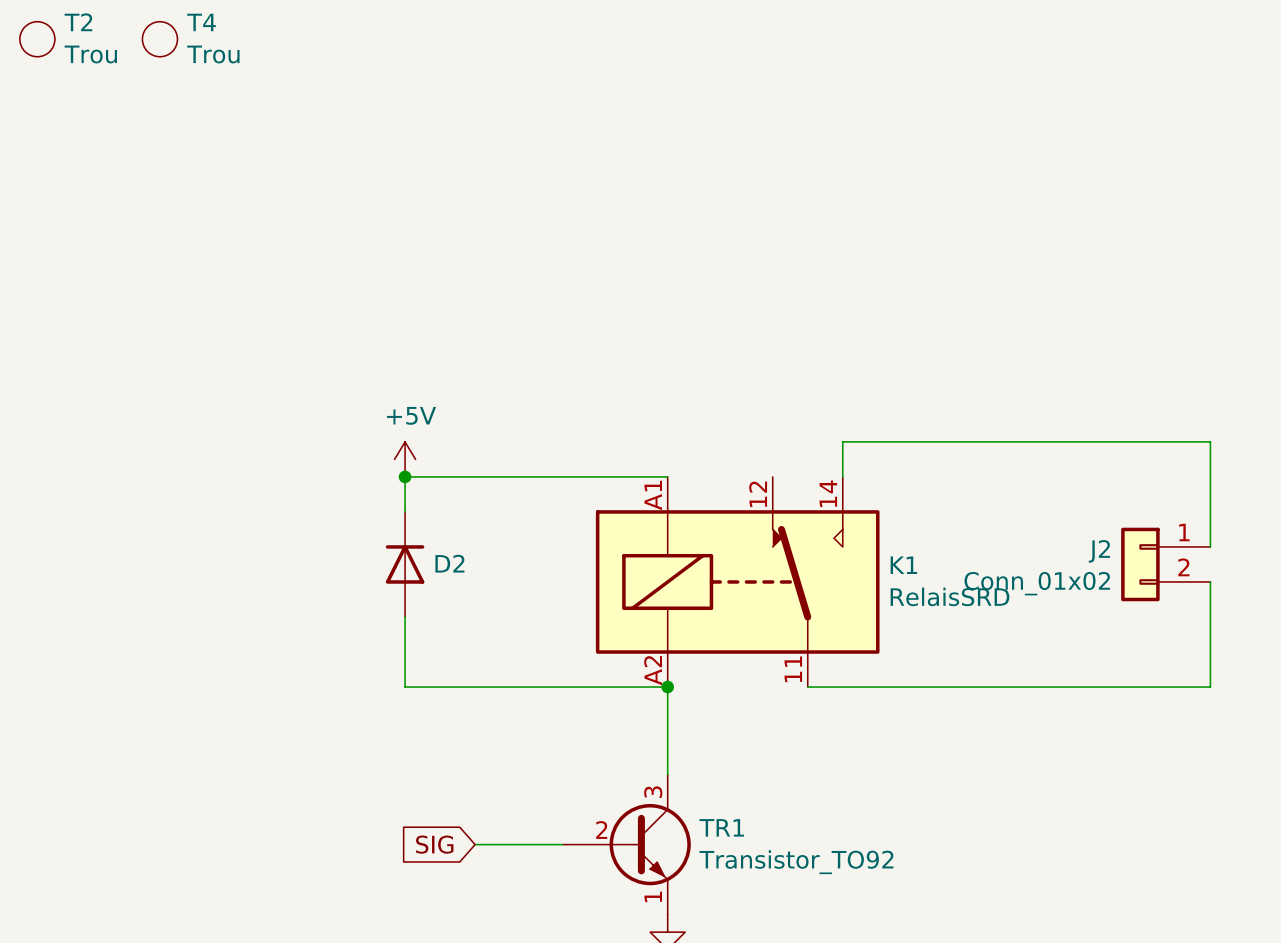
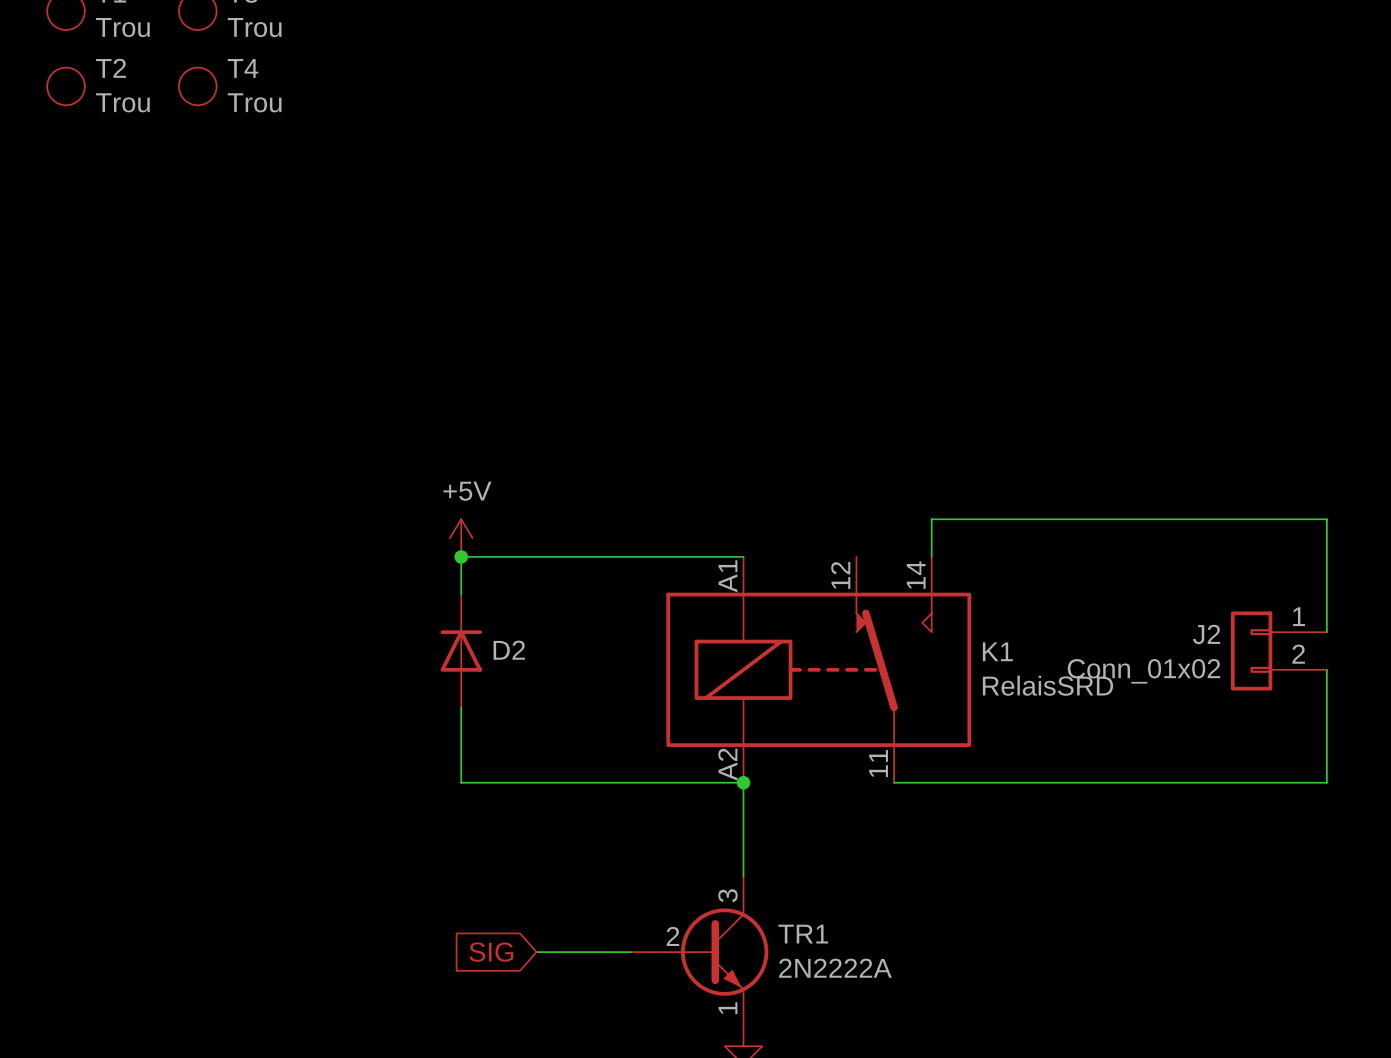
TR1 value: Transistor_TO92 (796, 862) -> 2N2222A (835, 968)

